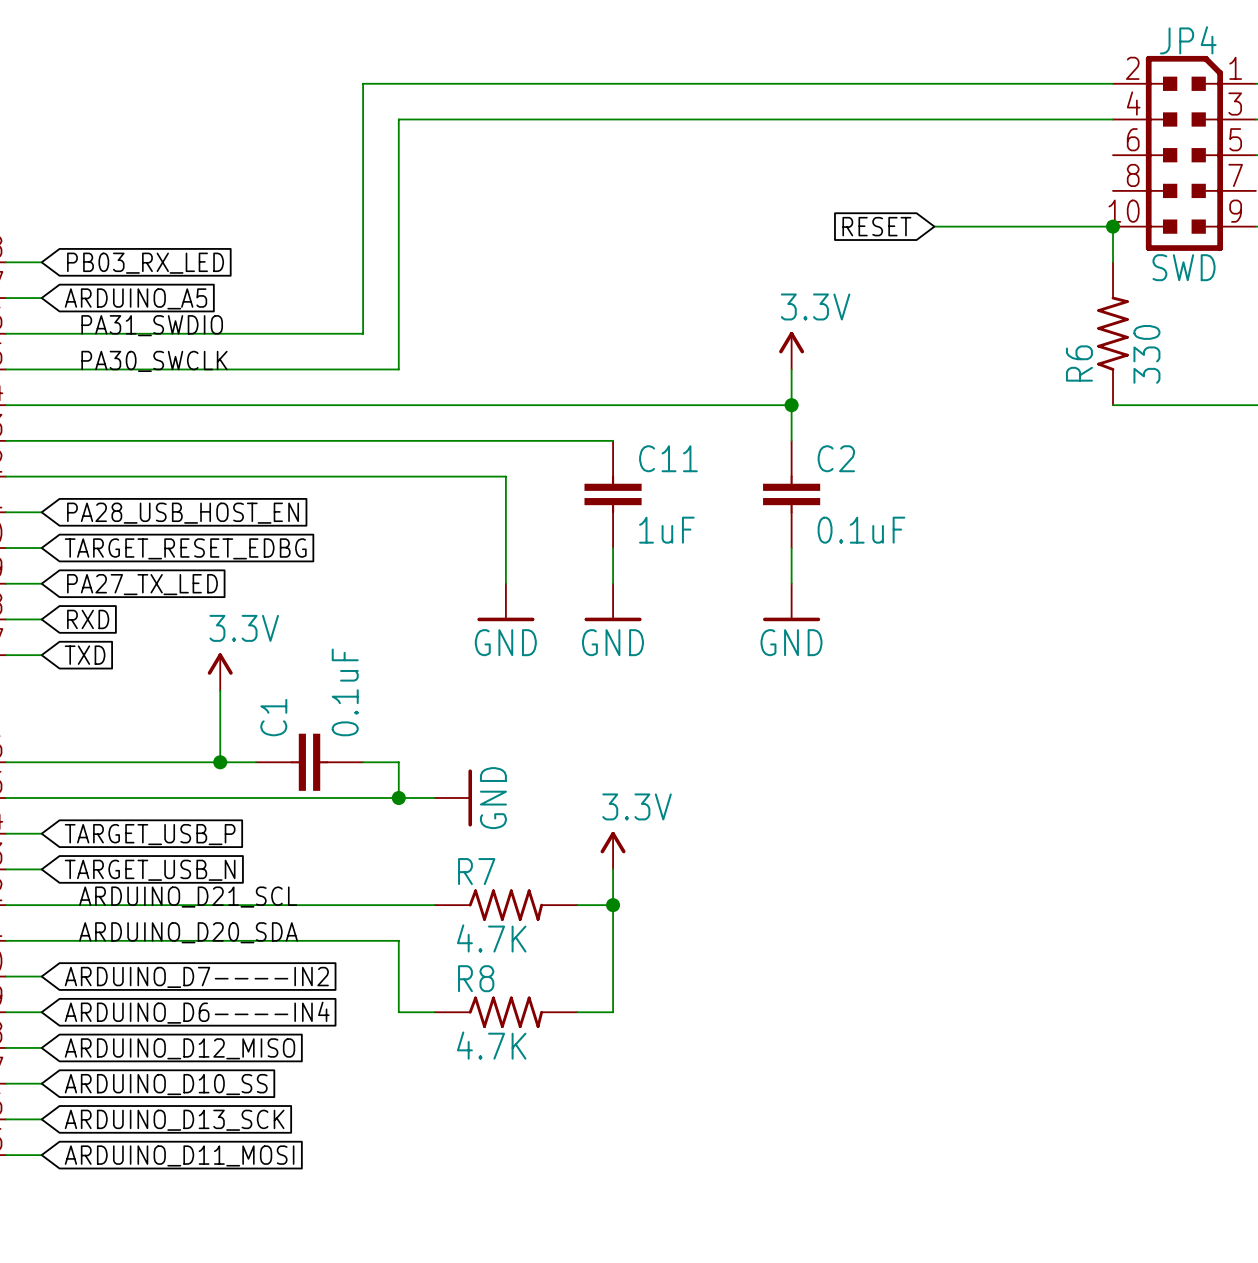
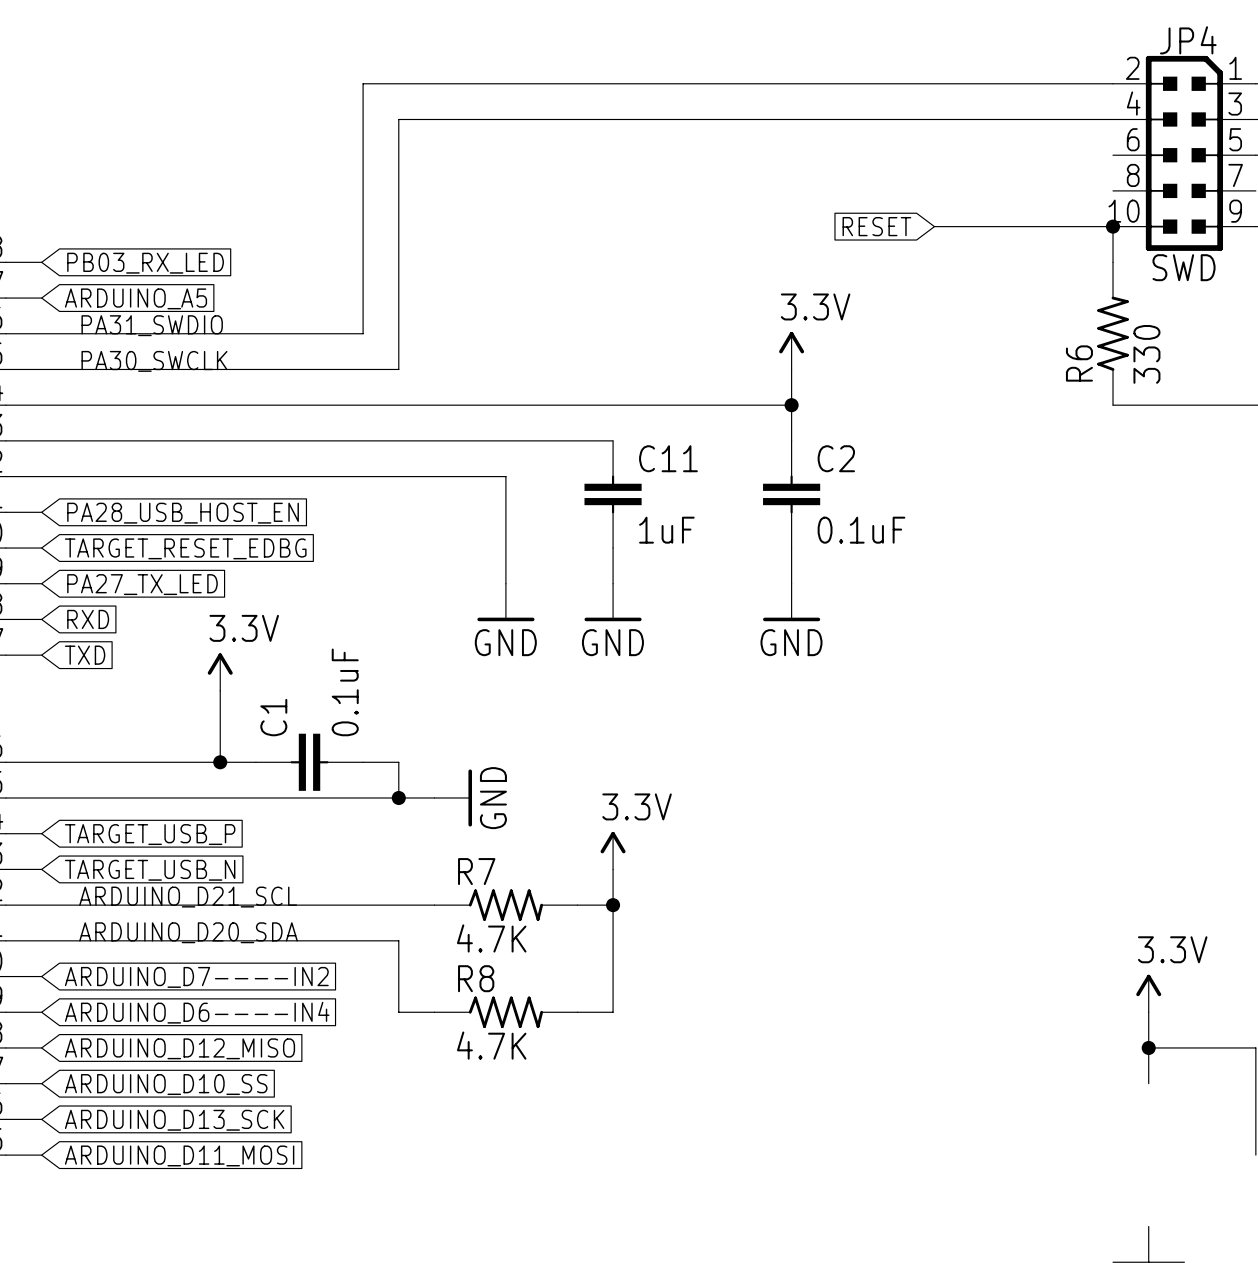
power symbol: none -> 3.3V (1148, 993)
wire: none -> (1148, 1012) (1148, 1083)
wire: none -> (1148, 1047) (1255, 1047) (1255, 1155)
junction: none -> (1148, 1047)
wire: none -> (1148, 1226) (1148, 1262)
wire: none -> (1113, 1262) (1184, 1262)

